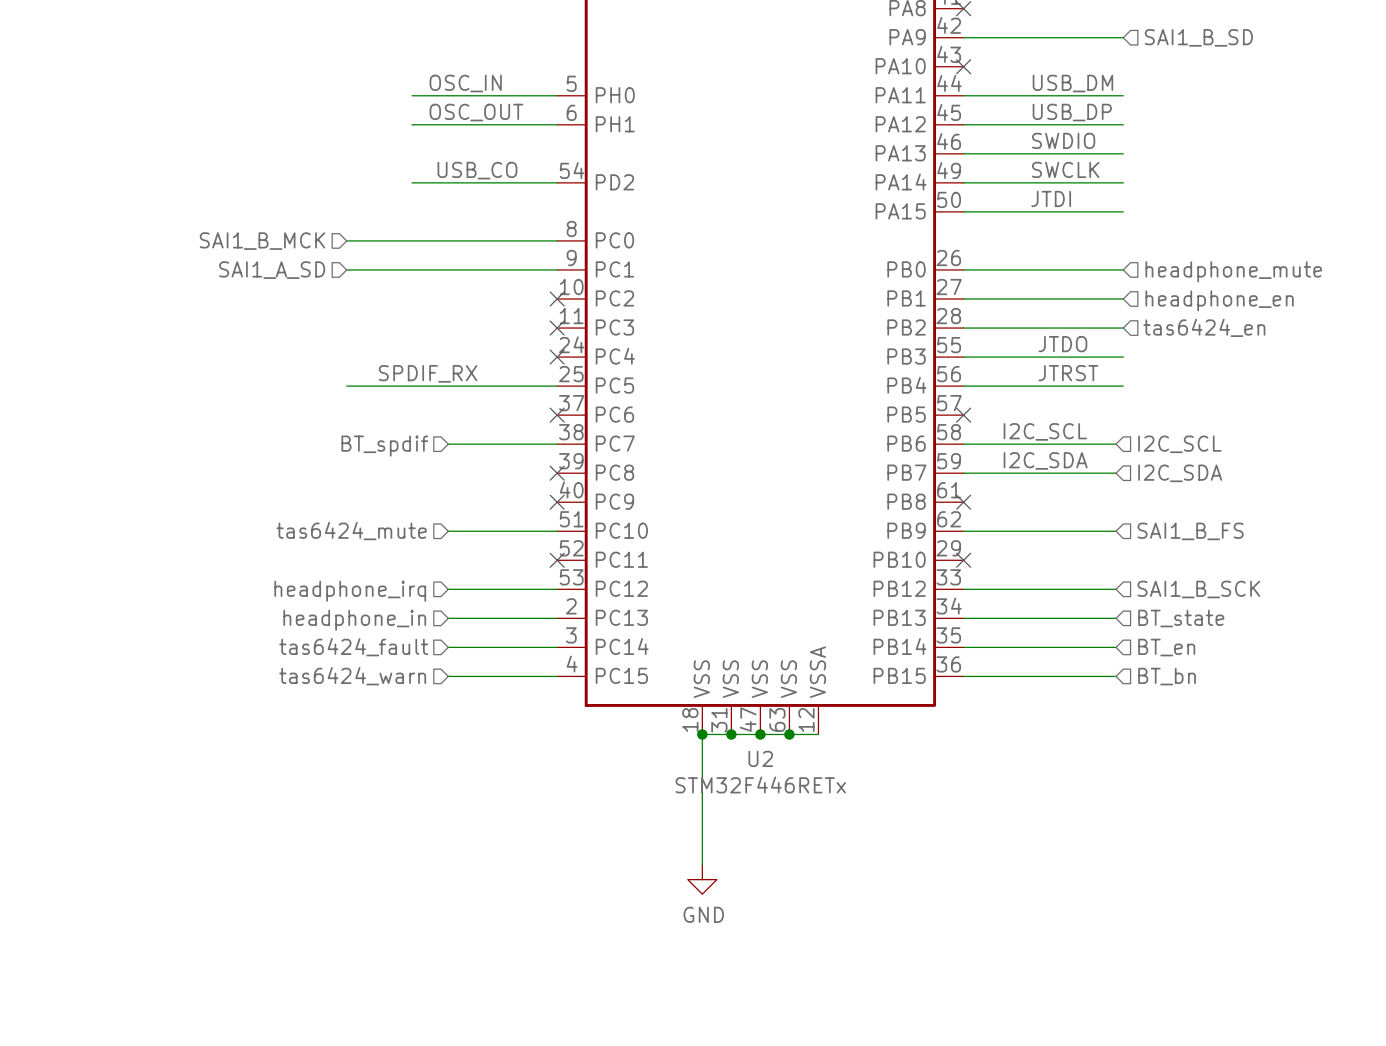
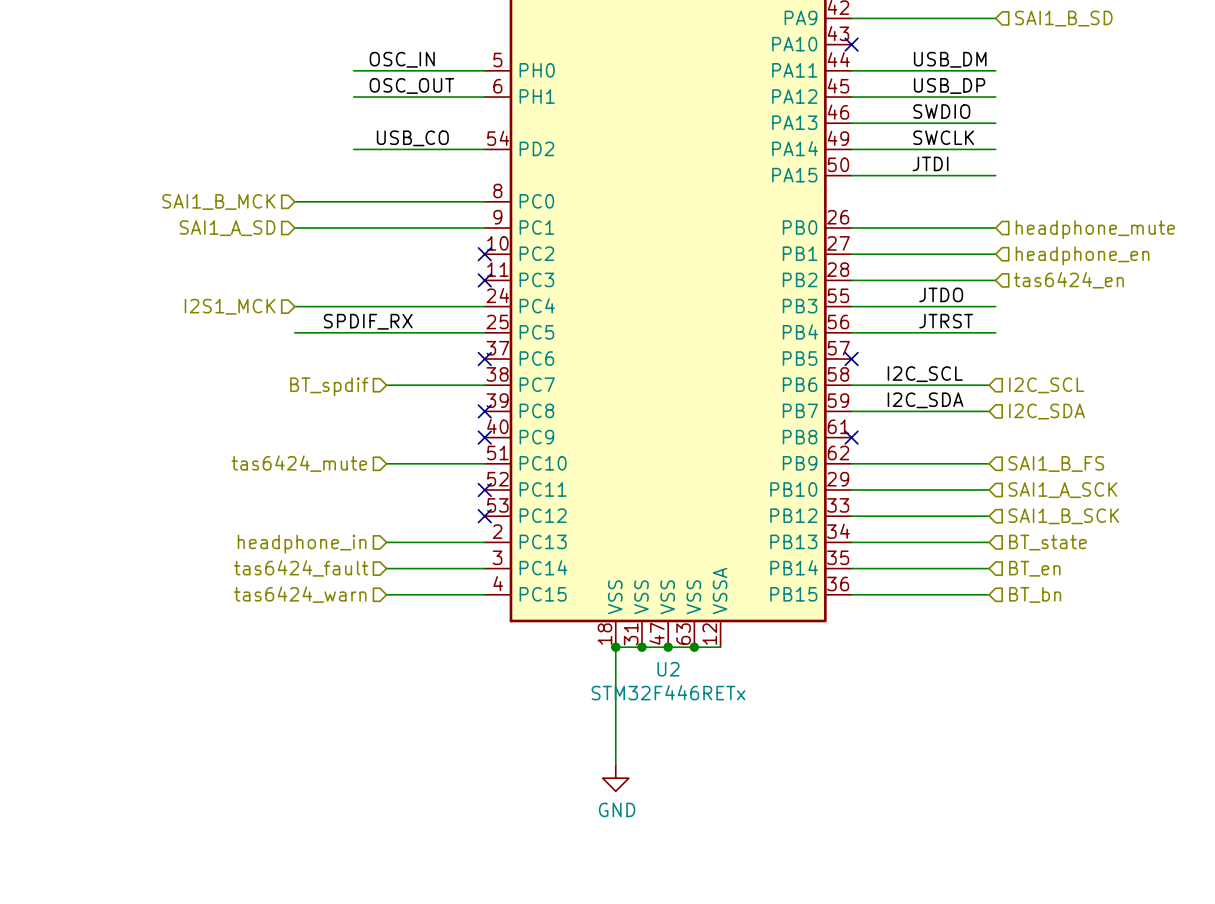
hierarchical label: none -> I2S1_MCK (230, 306)
wire: none -> (294, 306) (484, 306)
no-connect mark: (557, 357) -> none
wire: none -> (851, 490) (989, 490)
no-connect mark: (963, 560) -> none
hierarchical label: none -> SAI1_A_SCK (1062, 490)
wire: (448, 589) (557, 589) -> none
no-connect mark: none -> (484, 516)
hierarchical label: headphone_irq (350, 591) -> none

